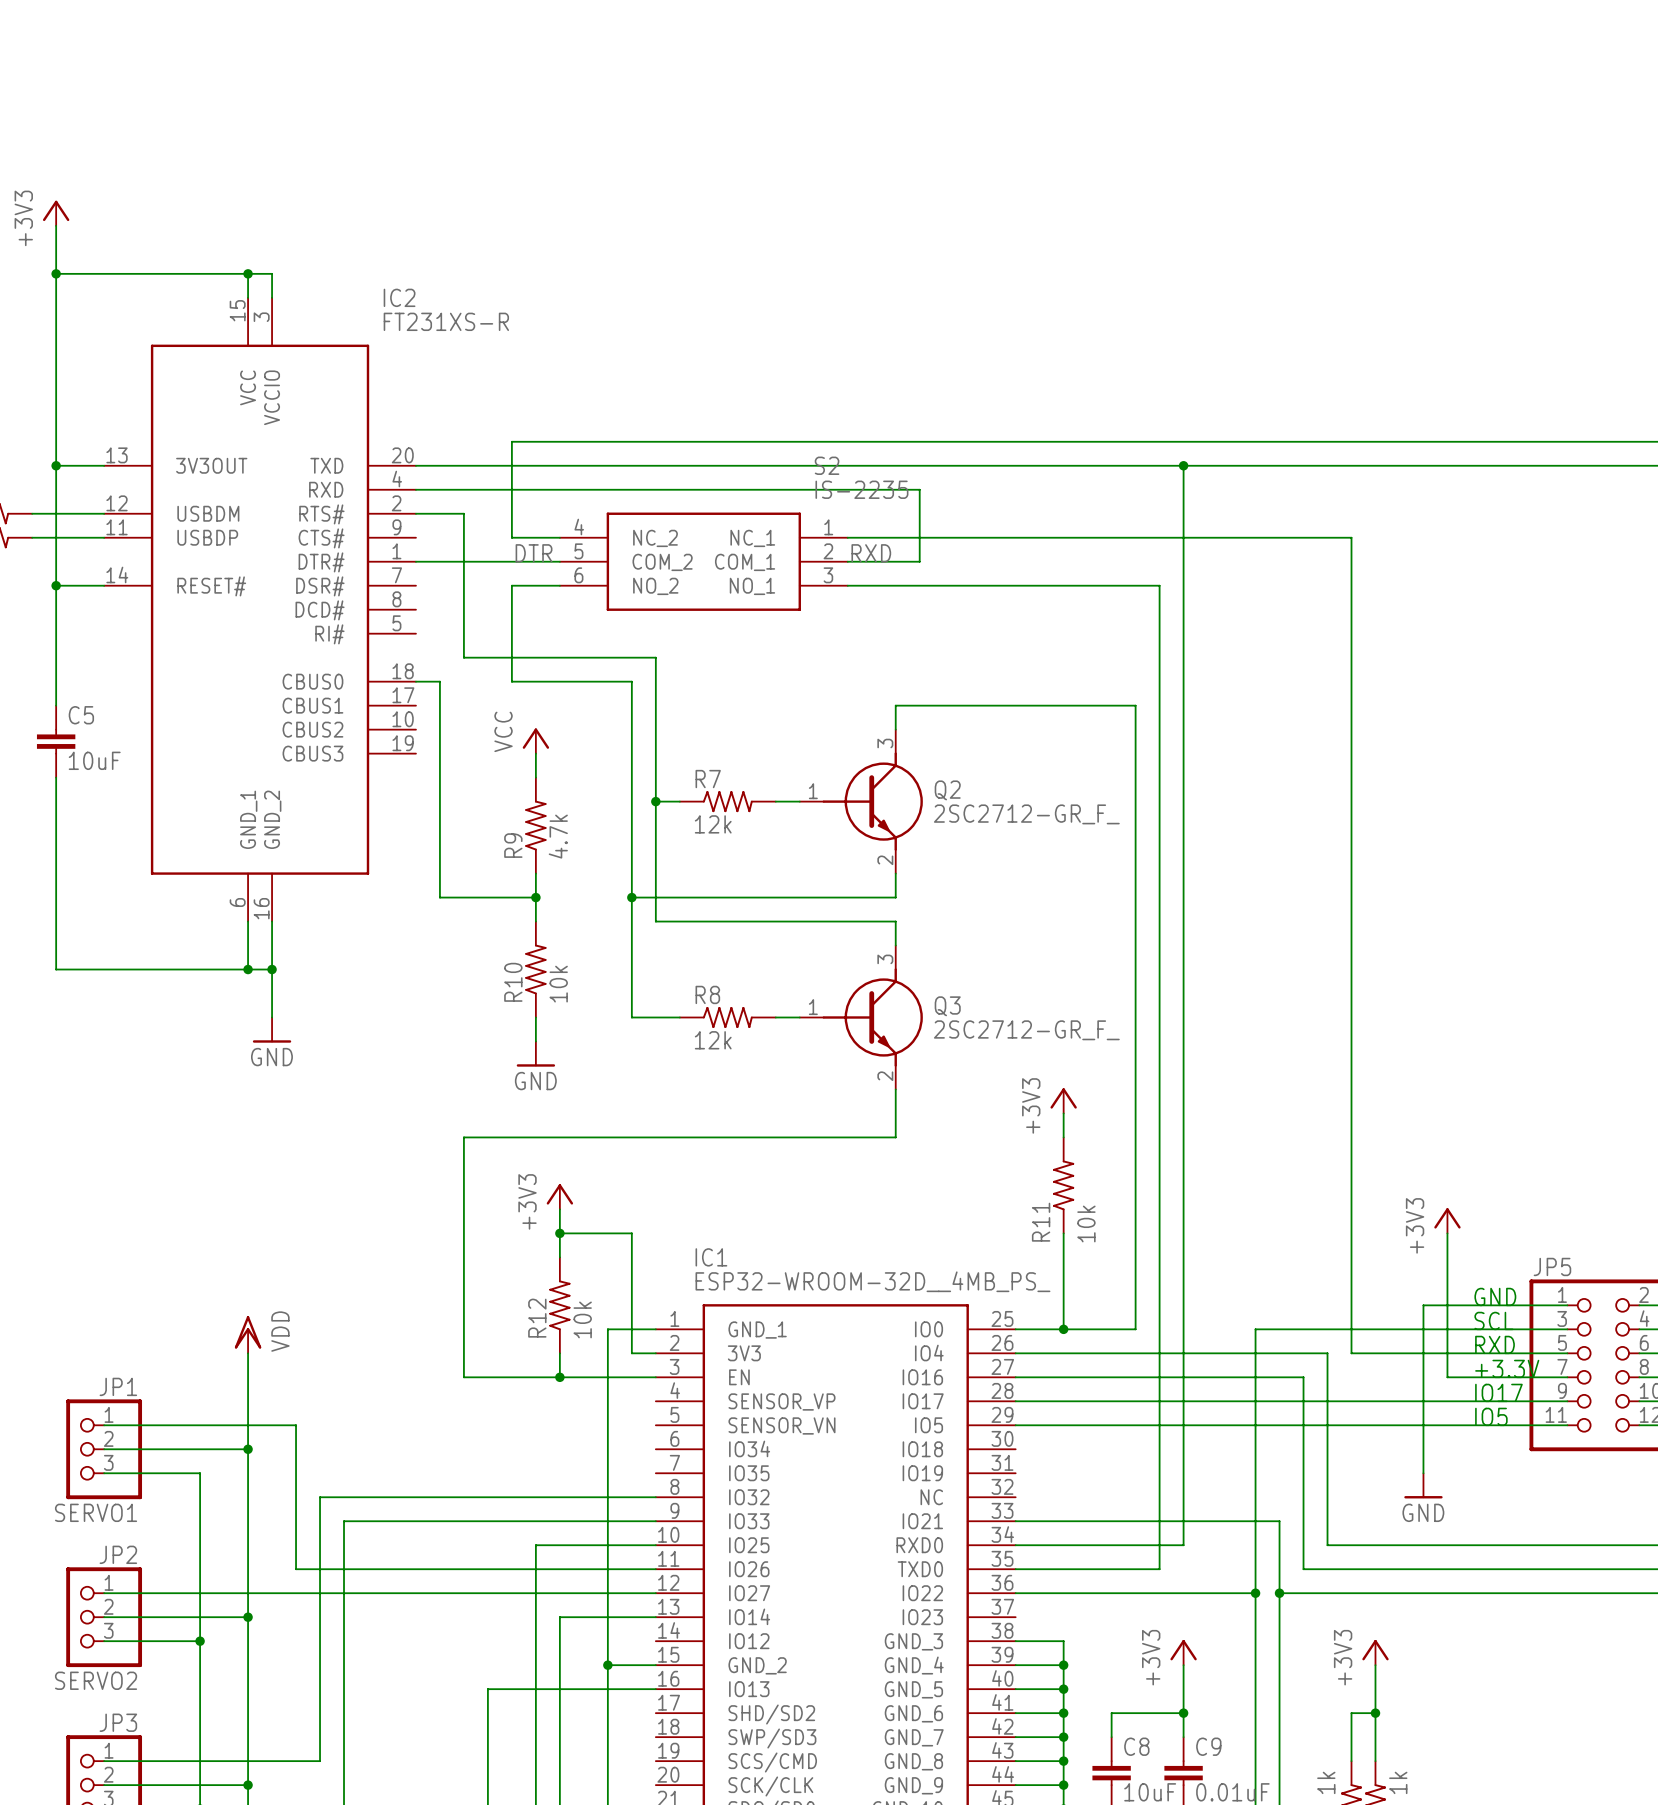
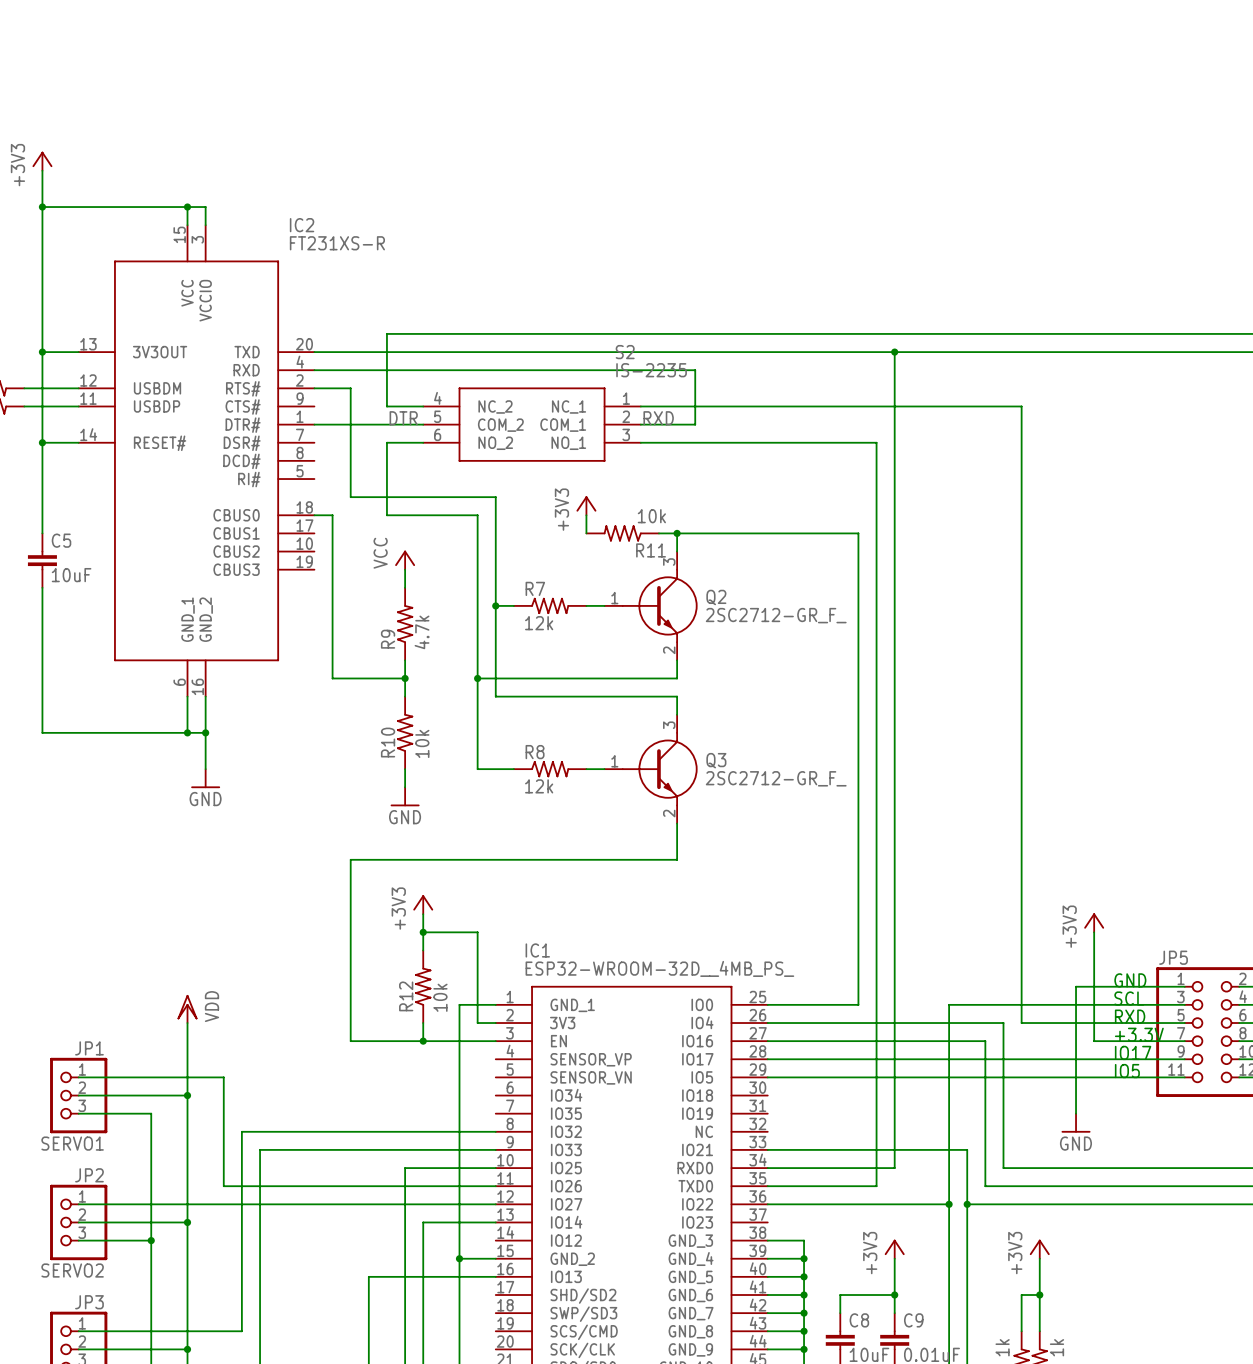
power symbol: none -> +3V3 (586, 505)
wire: none -> (586, 515) (586, 533)
wire: none -> (658, 533) (677, 533)
junction: none -> (677, 533)
power symbol: +3V3 (1063, 1100) -> none
wire: (1063, 1113) (1063, 1137) -> none
R11 rotation: 0° (1063, 1185) -> 90° counterclockwise (622, 533)
R11 position: (1063, 1185) -> (622, 533)
wire: (1063, 1233) (1063, 1329) -> none
junction: (1063, 1329) -> none

